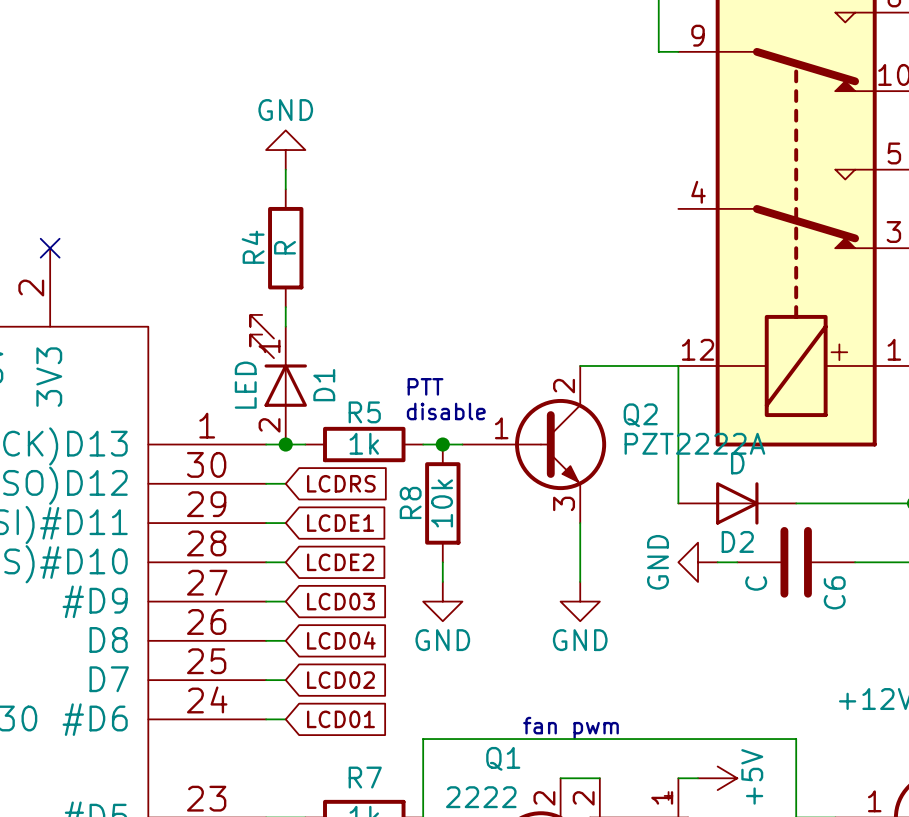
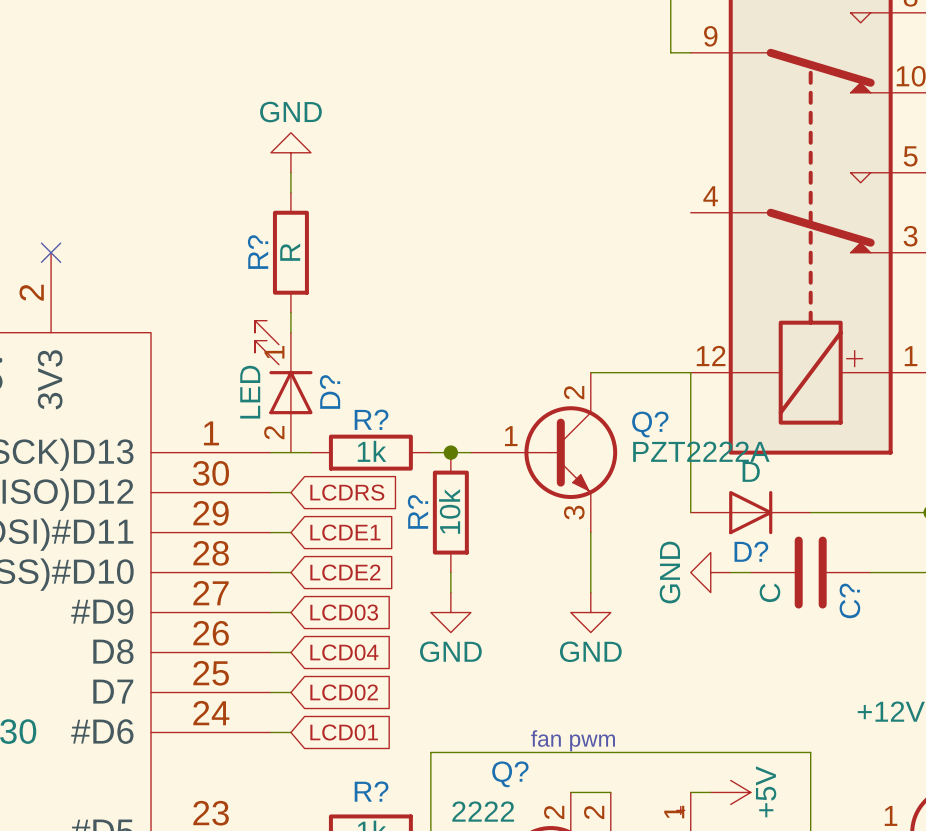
R4 name: R4 (253, 247) -> R? (258, 252)
D1 name: D1 (324, 385) -> D? (330, 392)
text: PTT (425, 386) -> none
text: disable (446, 411) -> none
R5 name: R5 (364, 412) -> R? (371, 419)
Q2 name: Q2 (640, 415) -> Q? (650, 424)
junction: (285, 444) -> none
R8 name: R8 (410, 502) -> R? (417, 511)
D2 name: D2 (737, 541) -> D? (751, 551)
C6 name: C6 (834, 592) -> C? (849, 600)
Q1 name: Q1 (503, 758) -> Q? (510, 774)
R7 name: R7 (365, 777) -> R? (371, 791)

